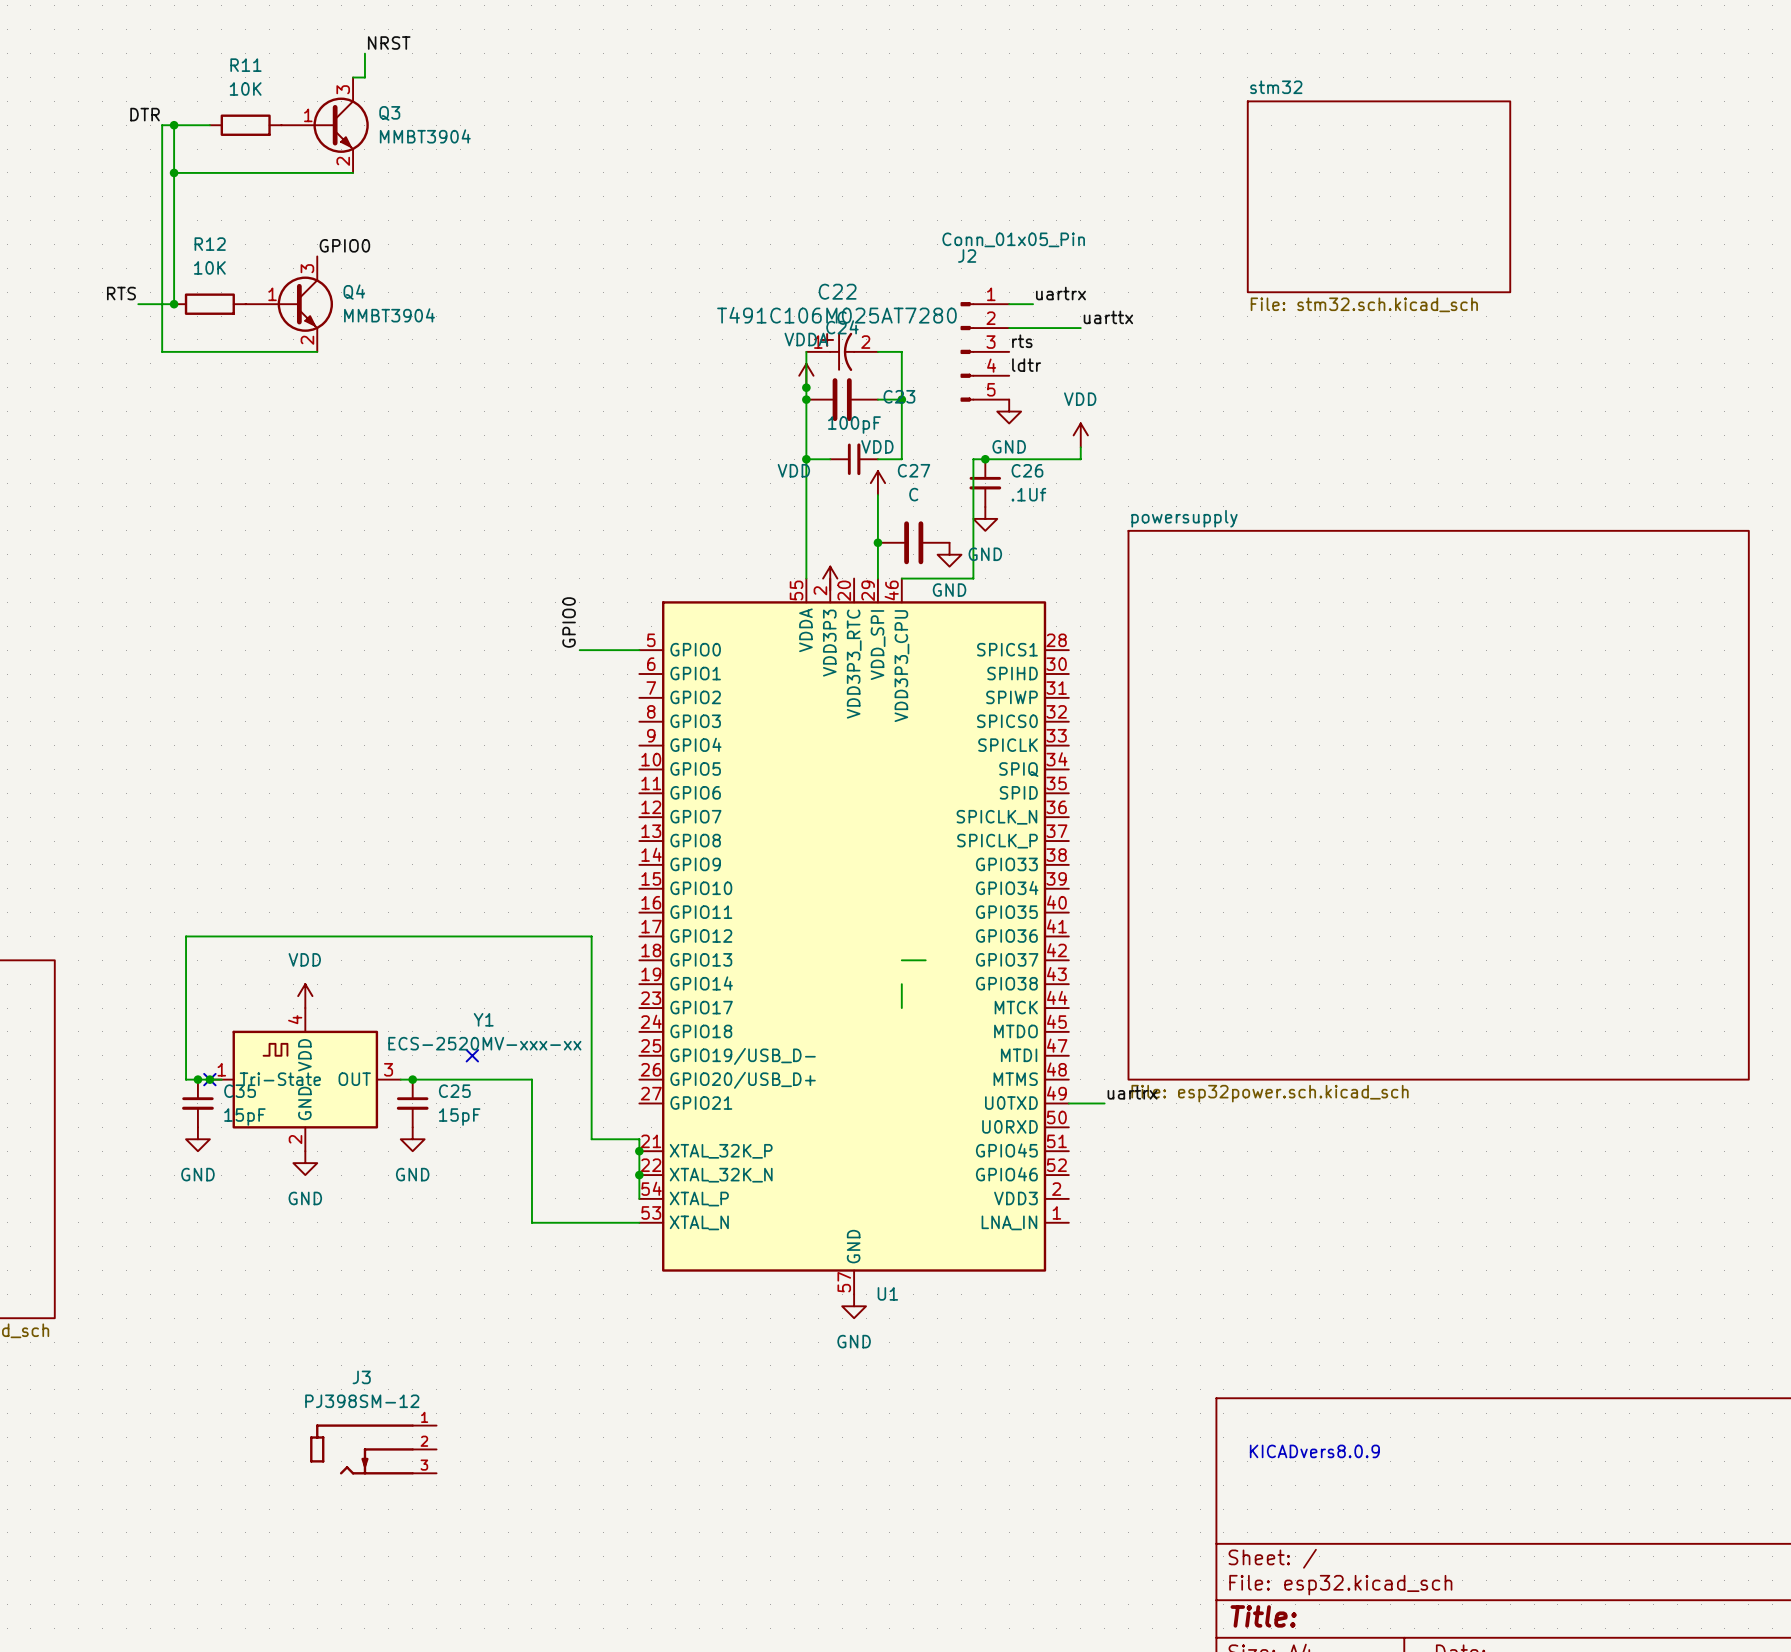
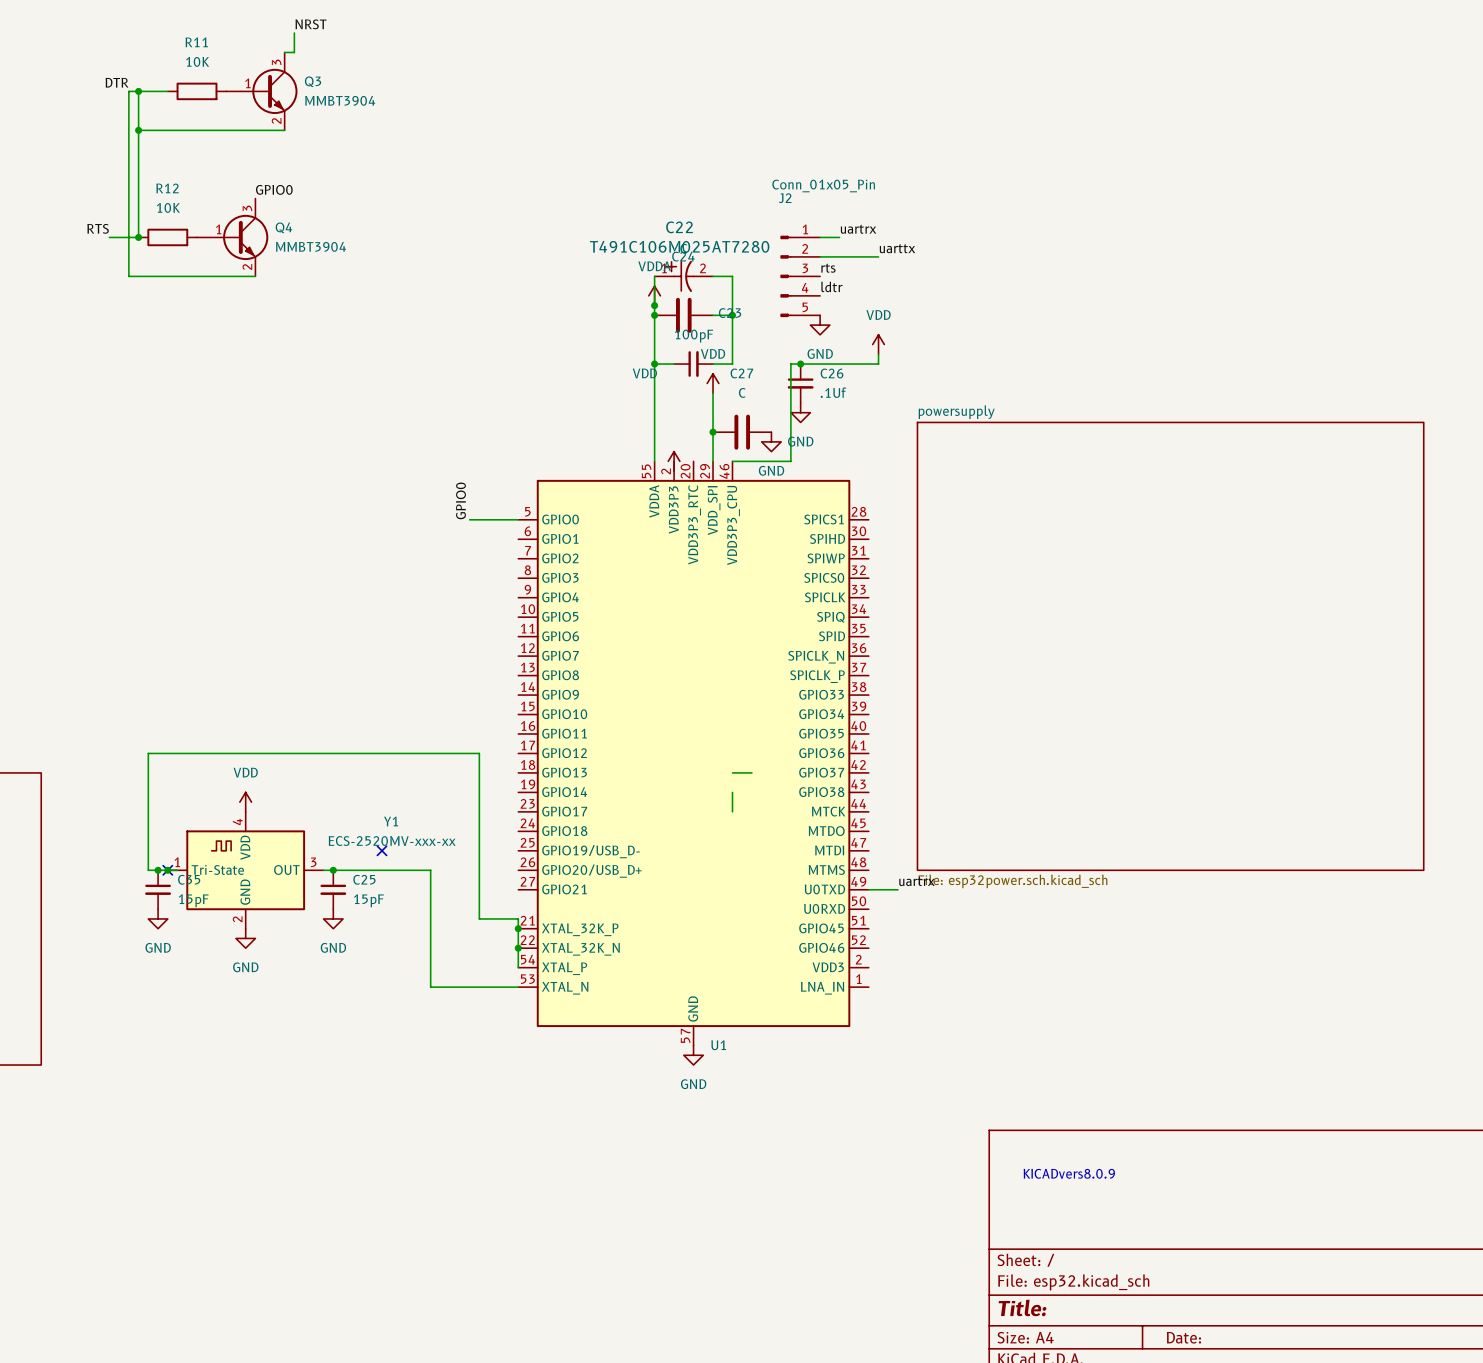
sheet stm32: File: stm32.sch.kicad_sch (1379, 196) -> none
J3: PJ398SM-12 (373, 1449) -> none

